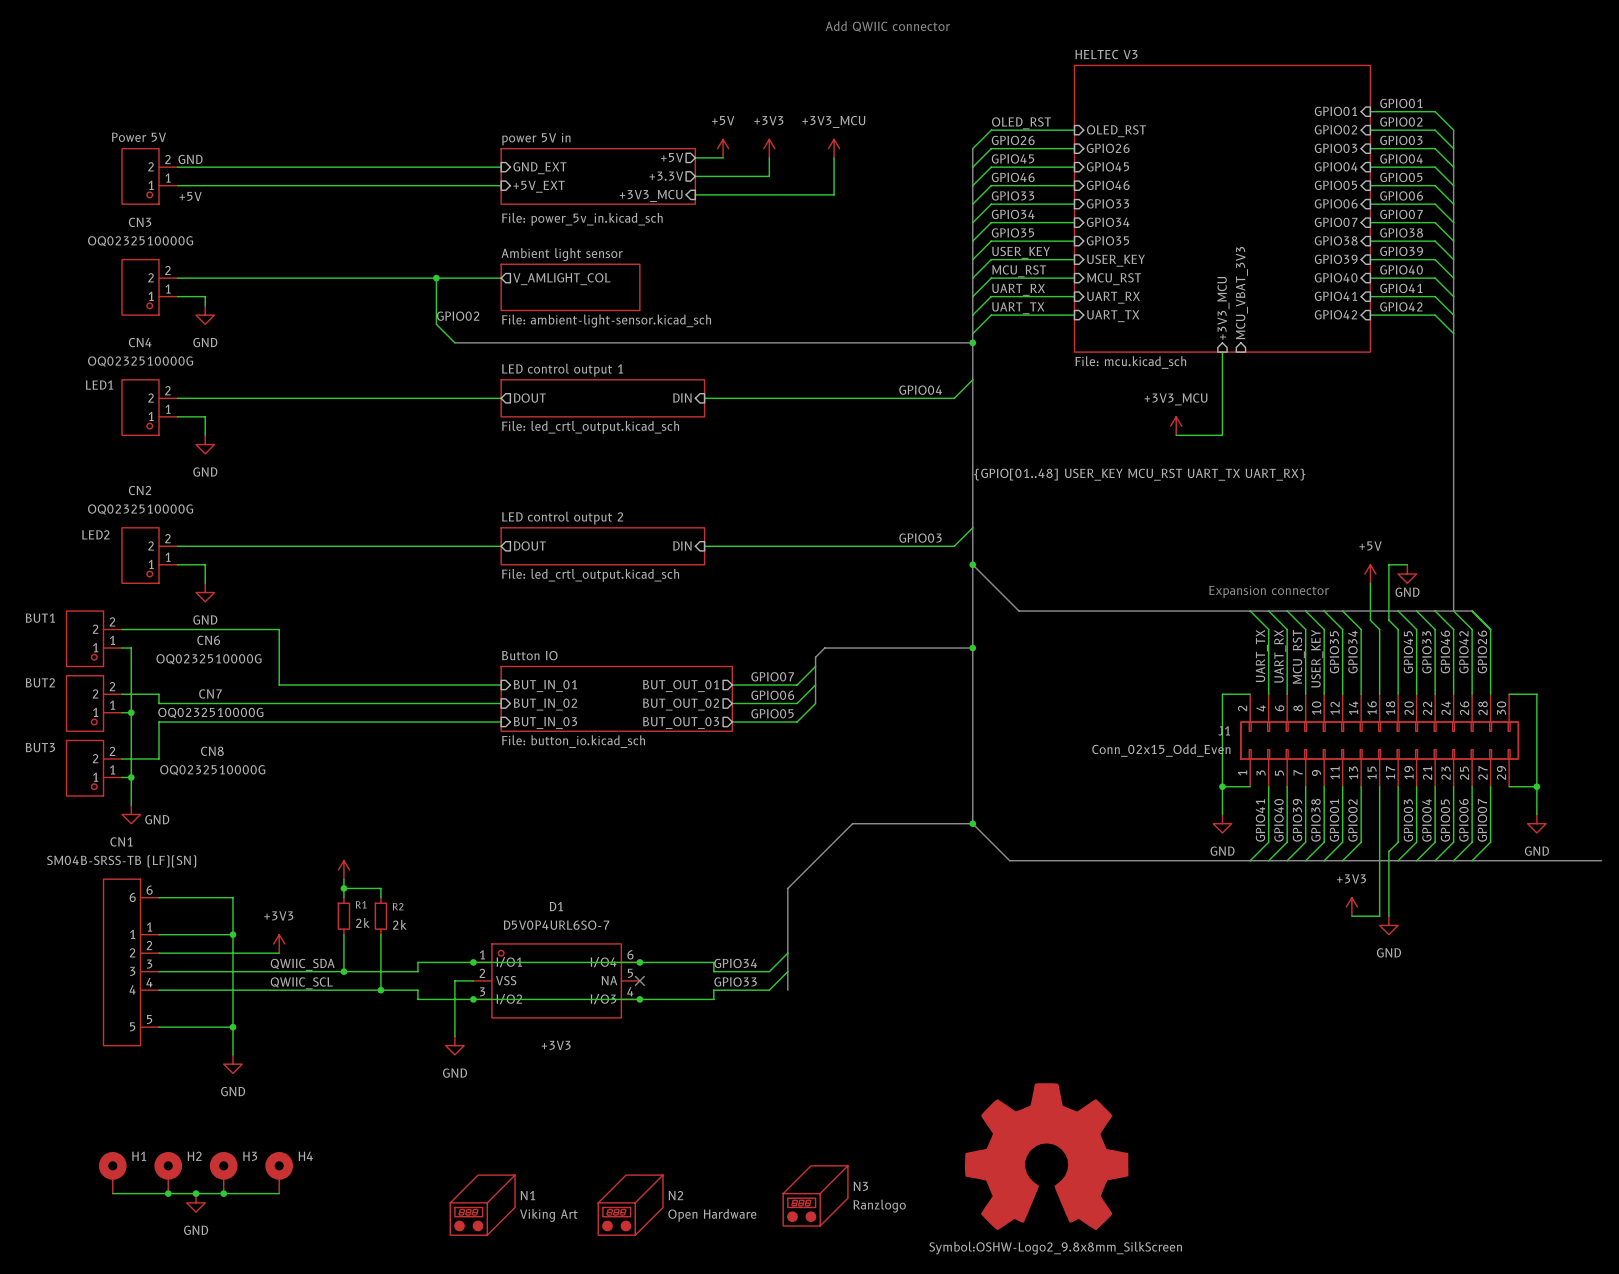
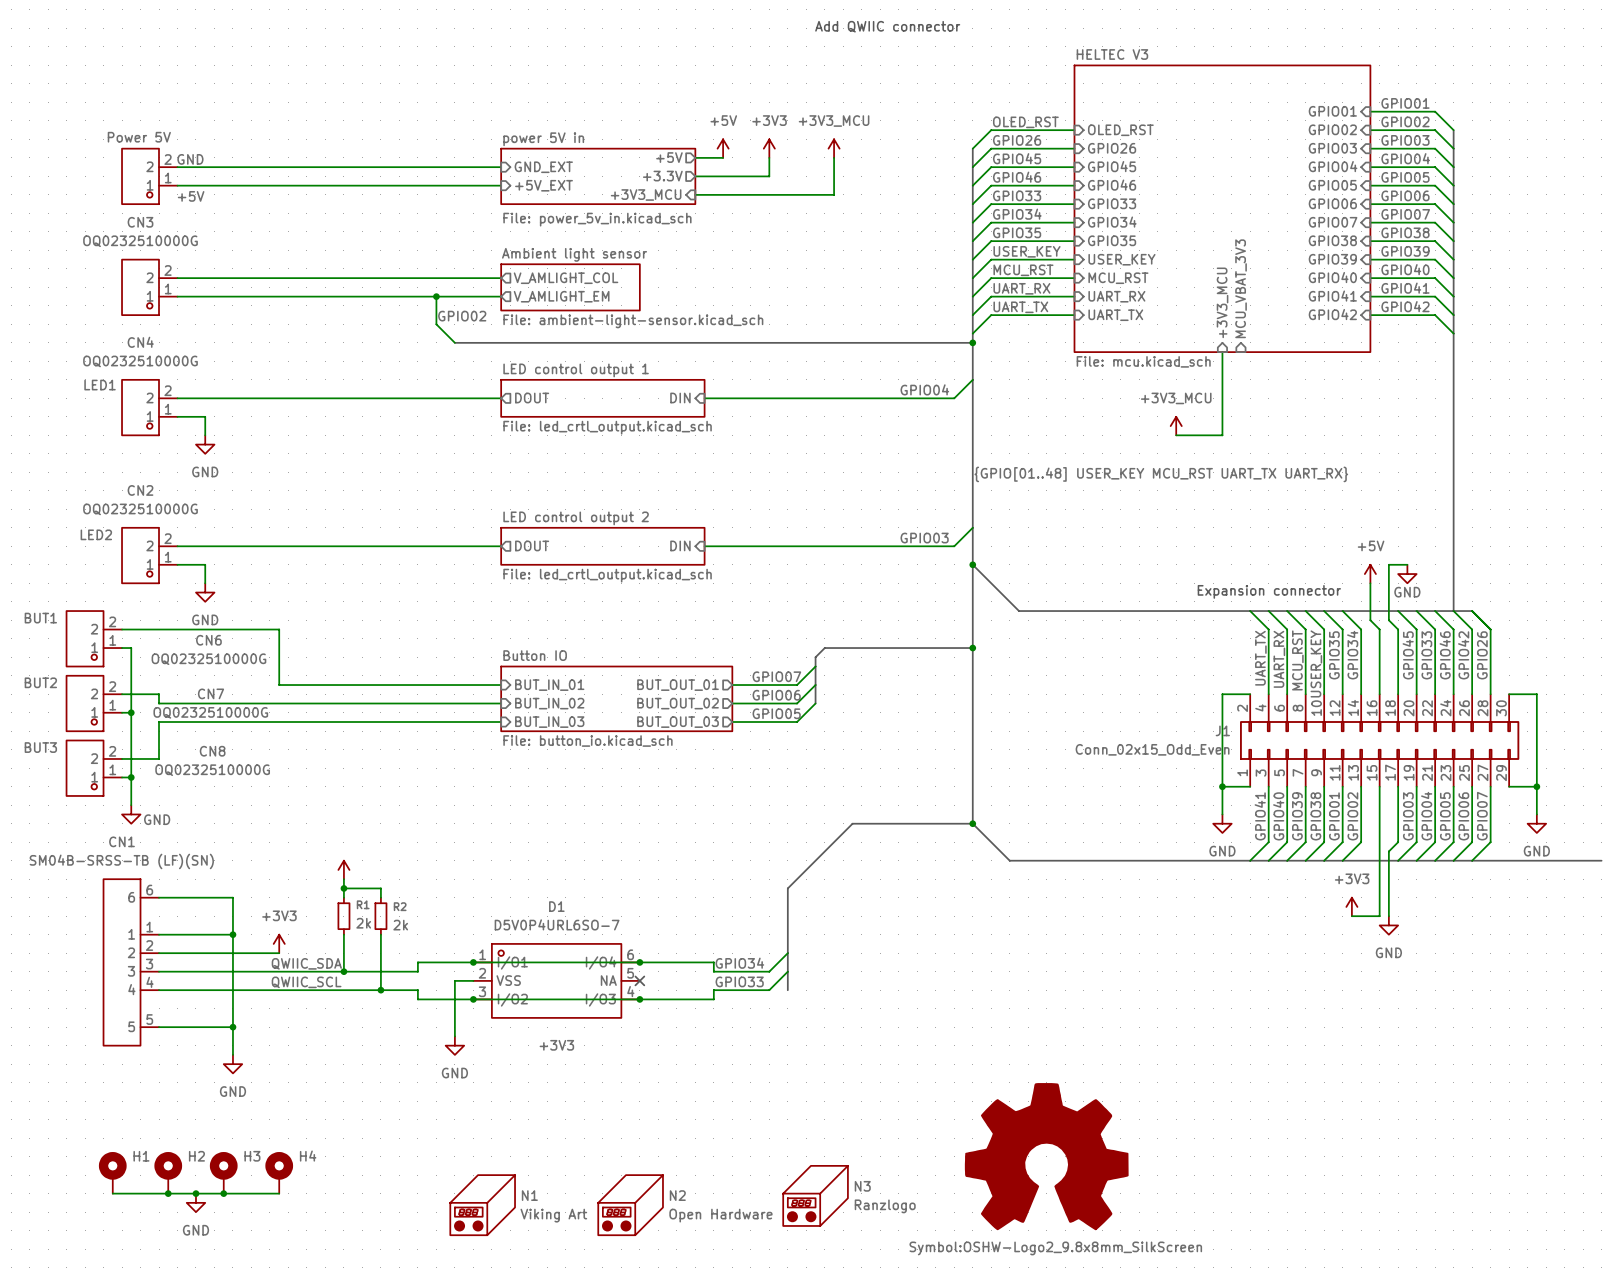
wire: (436, 278) (436, 296) -> none
junction position: (436, 278) -> (436, 296)
wire: (205, 296) (205, 305) -> (205, 296) (501, 296)
sheet pin: none -> V_AMLIGHT_EM (561, 296)
power symbol: GND (205, 315) -> none

